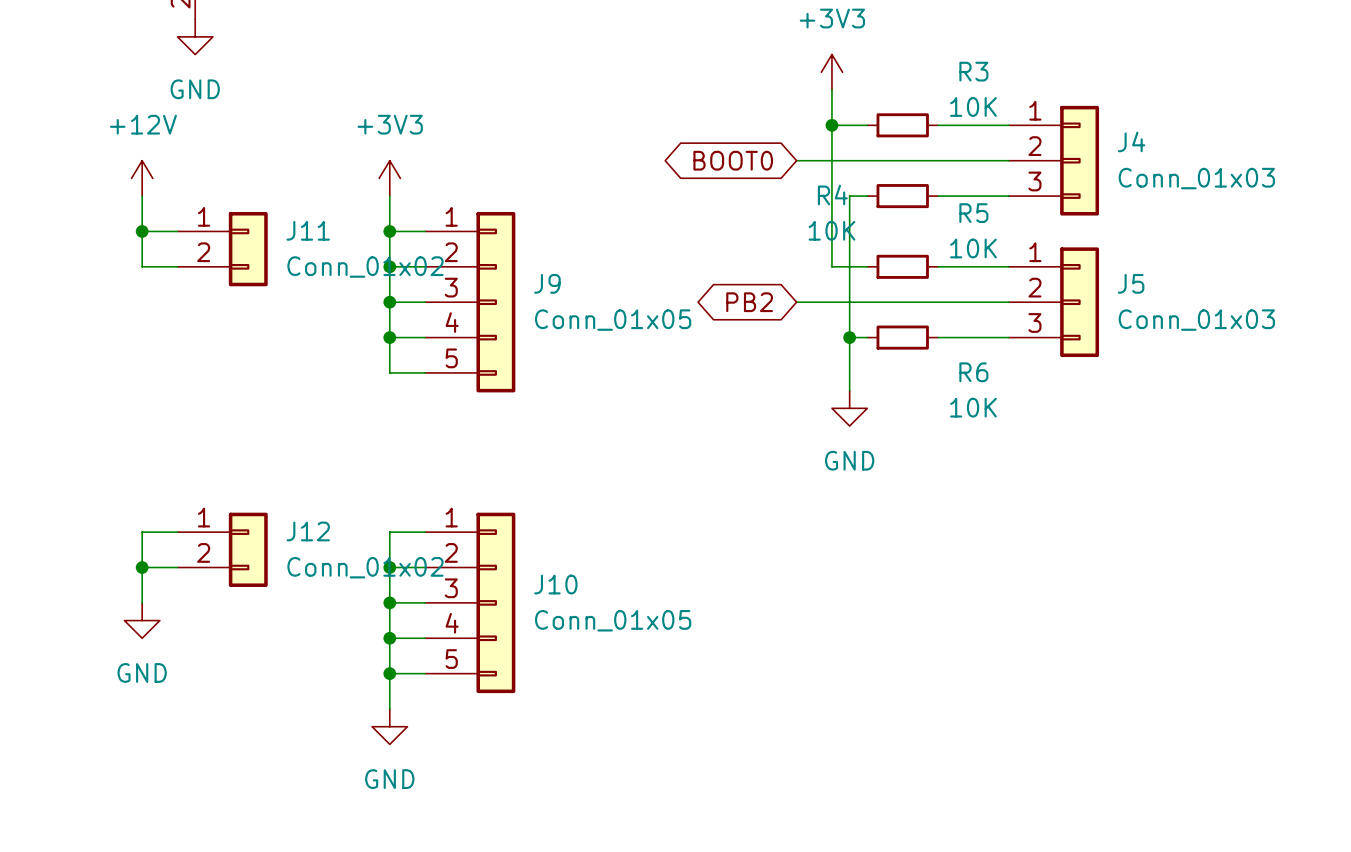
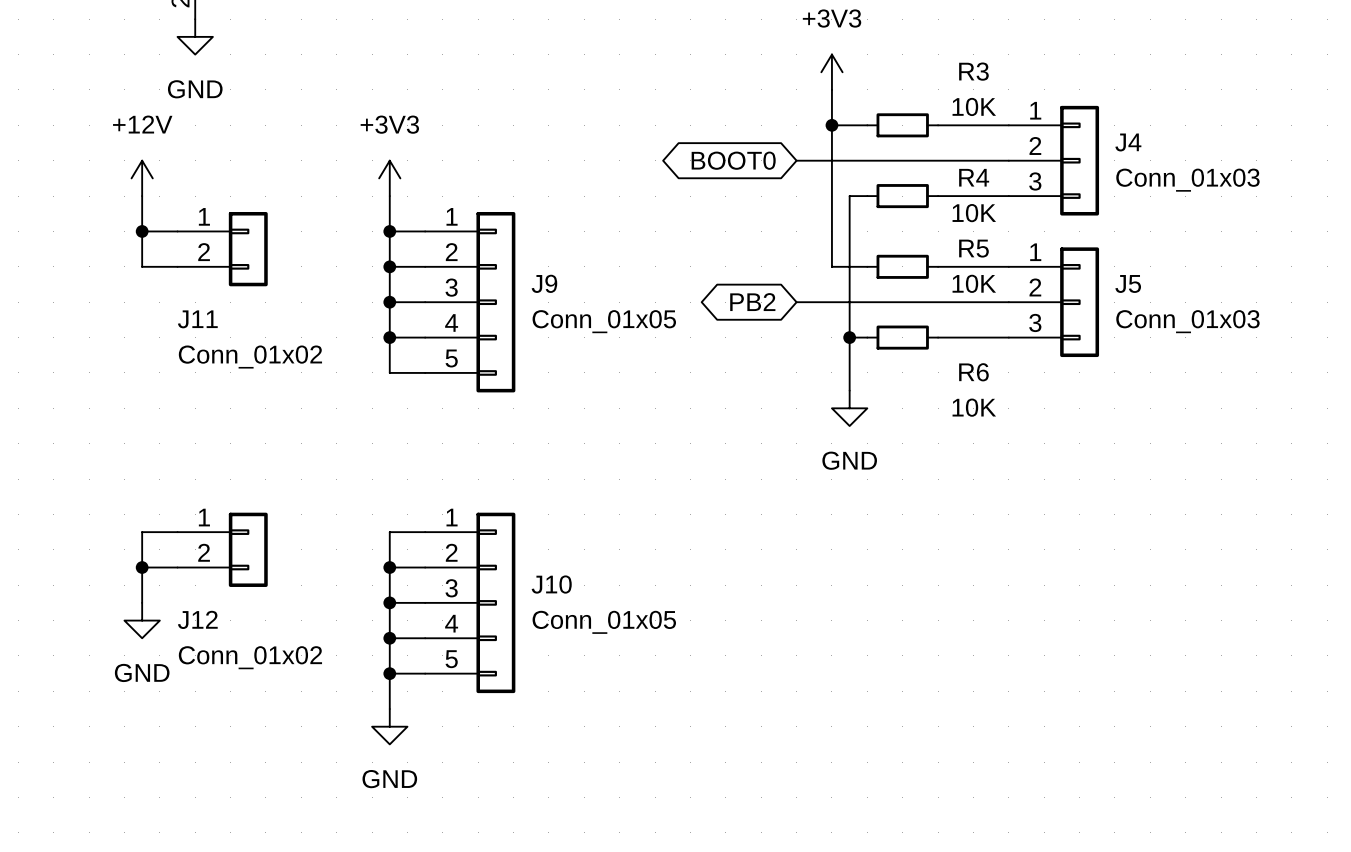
R4 name position: R4 (832, 195) -> R4 (974, 177)
R5 name position: R5 (973, 213) -> R5 (973, 248)
J11 name position: J11 (308, 230) -> J11 (197, 319)
R4 value position: 10K (831, 230) -> 10K (974, 213)
R5 value position: 10K (973, 248) -> 10K (974, 283)
J11 value position: Conn_01x02 (365, 267) -> Conn_01x02 (250, 357)
J12 name position: J12 (308, 531) -> J12 (197, 619)
J12 value position: Conn_01x02 (365, 567) -> Conn_01x02 (250, 657)

